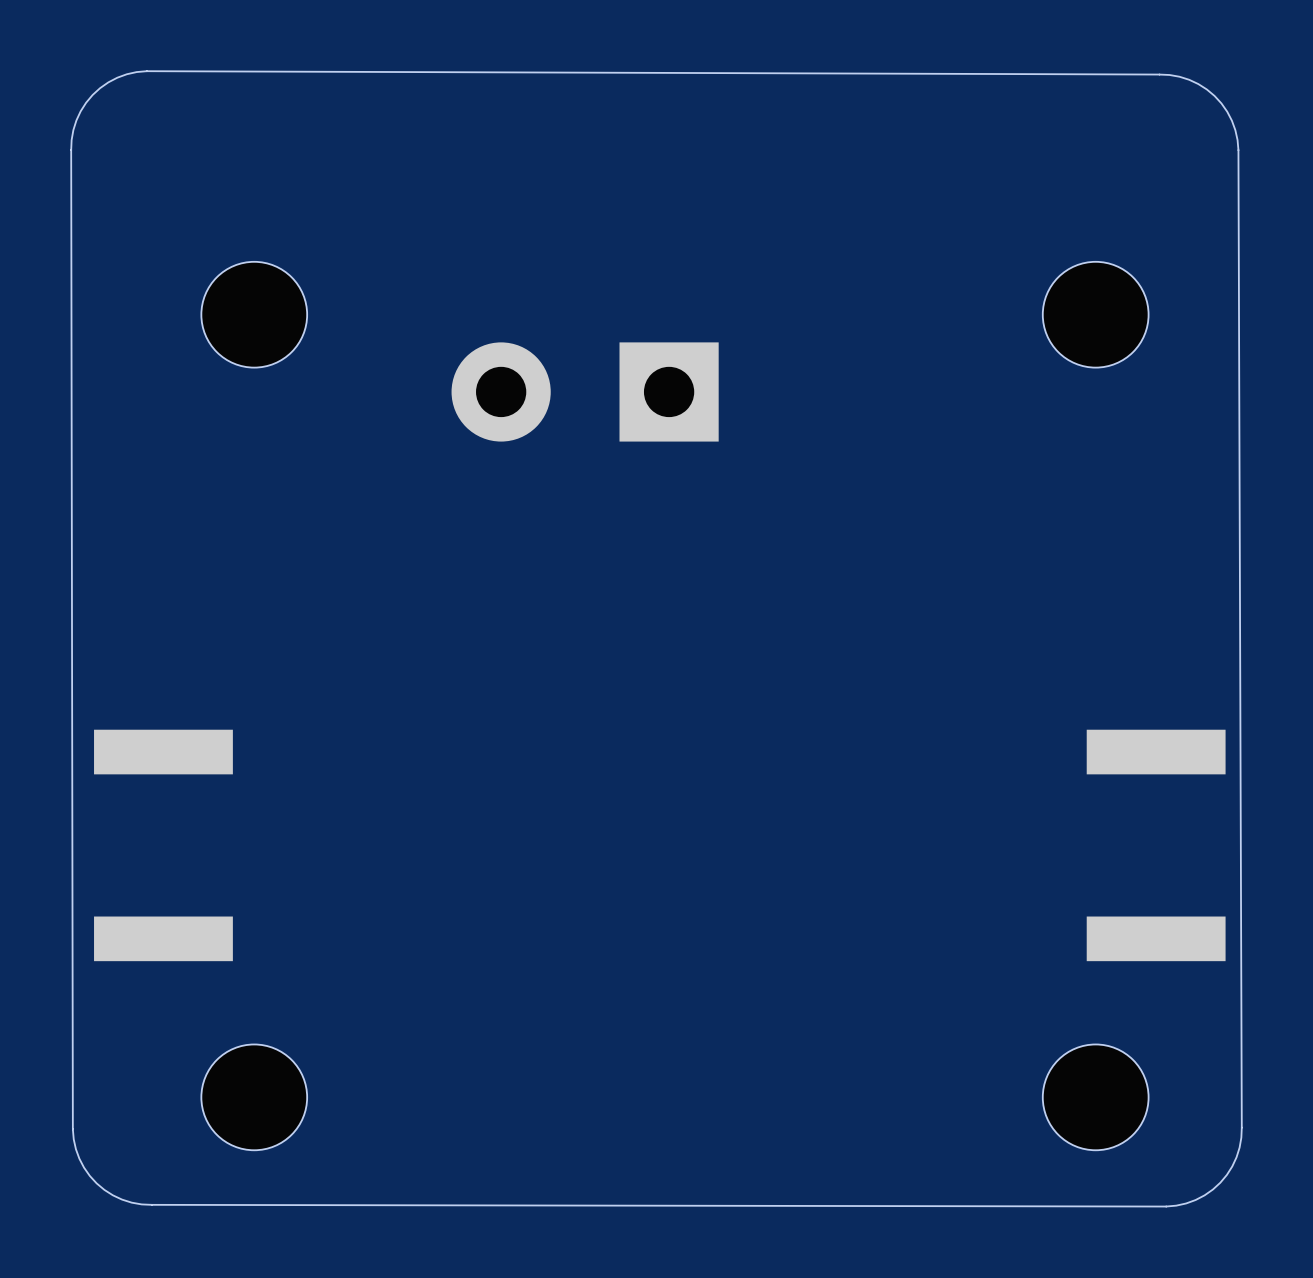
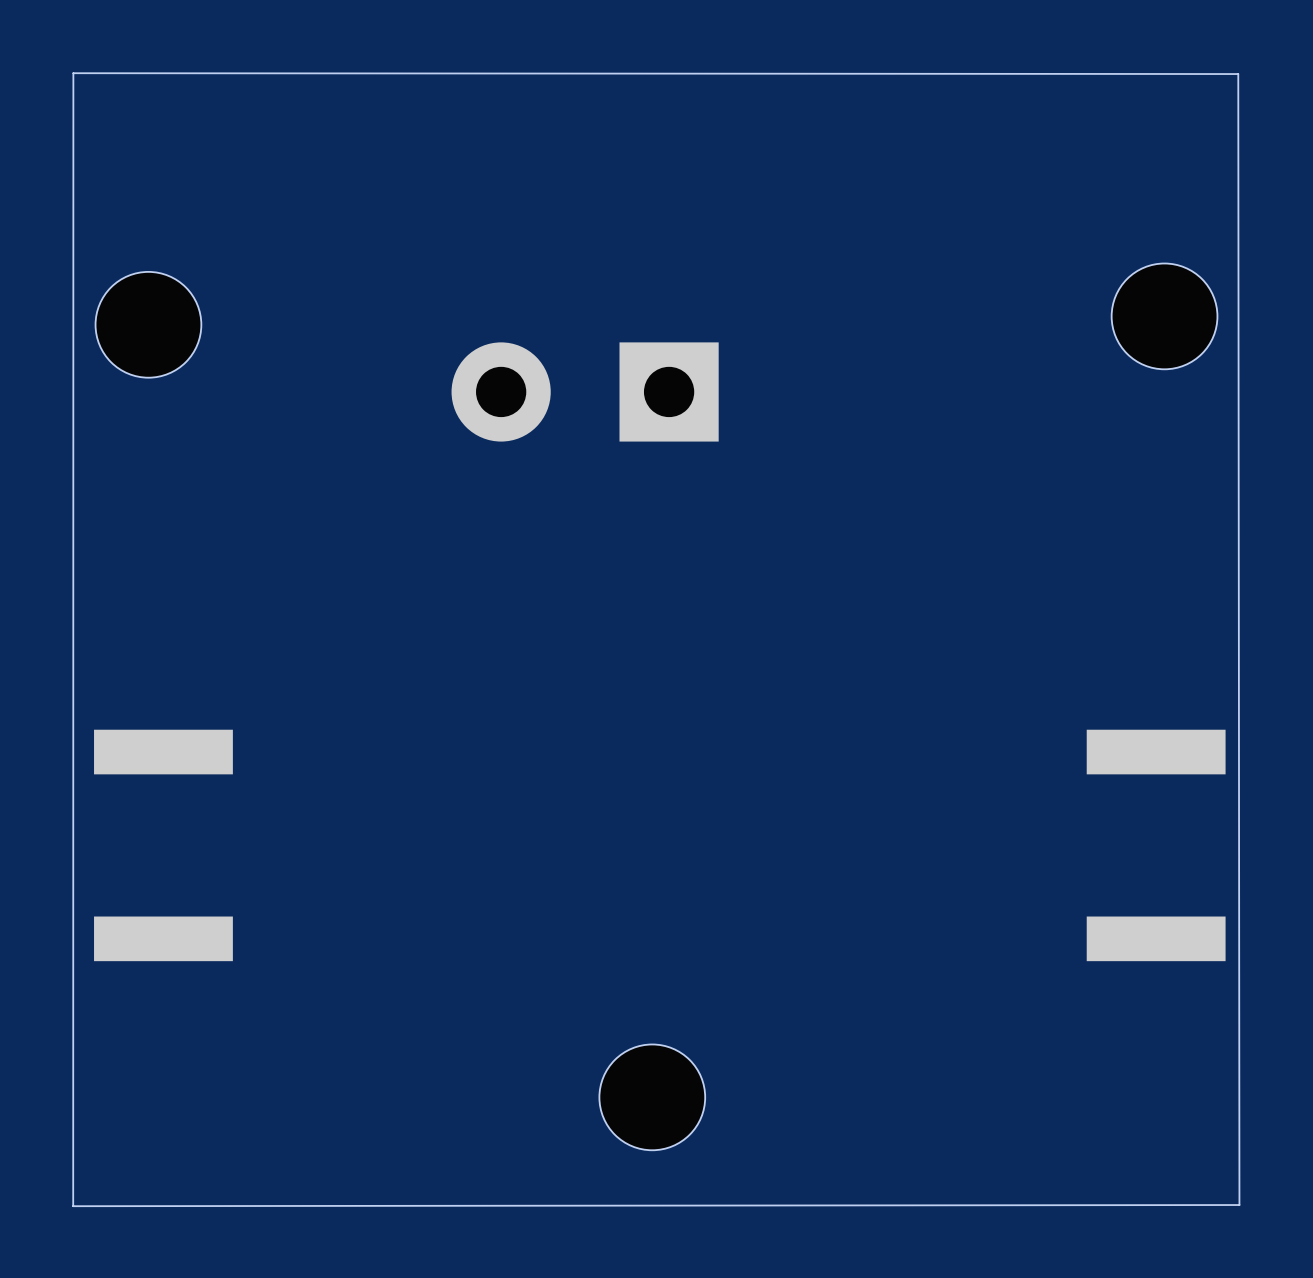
board edge: (146, 71) (1159, 74) (1189, 79) (1214, 95) (1231, 120) (1238, 150) (1241, 1127) (1236, 1157) (1220, 1182) (1195, 1200) (1166, 1206) (151, 1204) (122, 1199) (96, 1183) (79, 1158) (72, 1129) (71, 140) (80, 111) (100, 88) (126, 74) (146, 71) -> (73, 73) (1238, 74) (1239, 1205) (73, 1206) (73, 73)
part position: (254, 314) -> (148, 324)
part position: (1095, 314) -> (1164, 316)
part: (254, 1097) -> none
part: none -> (652, 1097)
part: (1095, 1097) -> none

